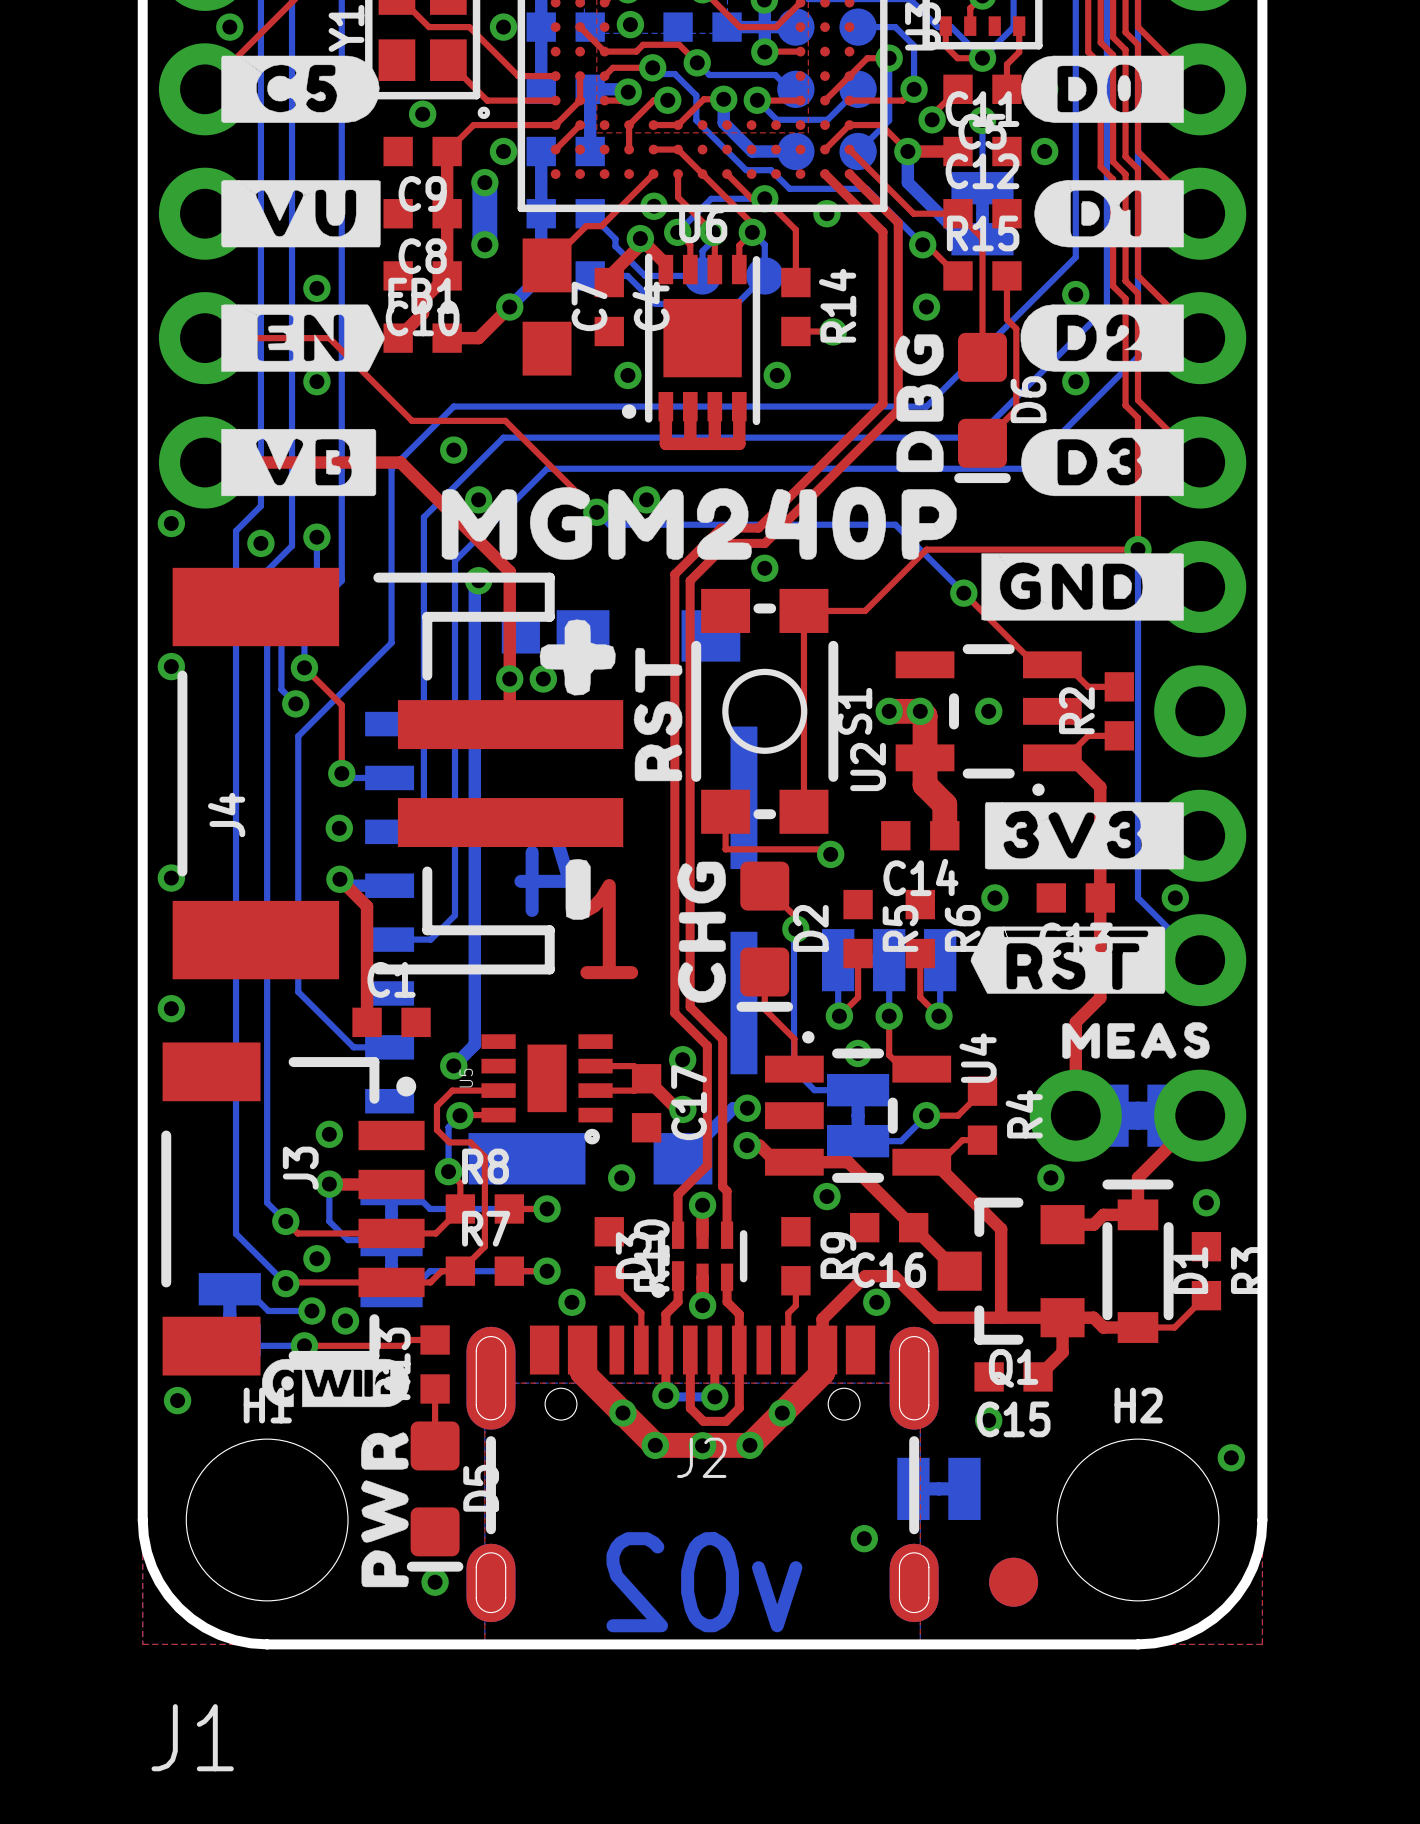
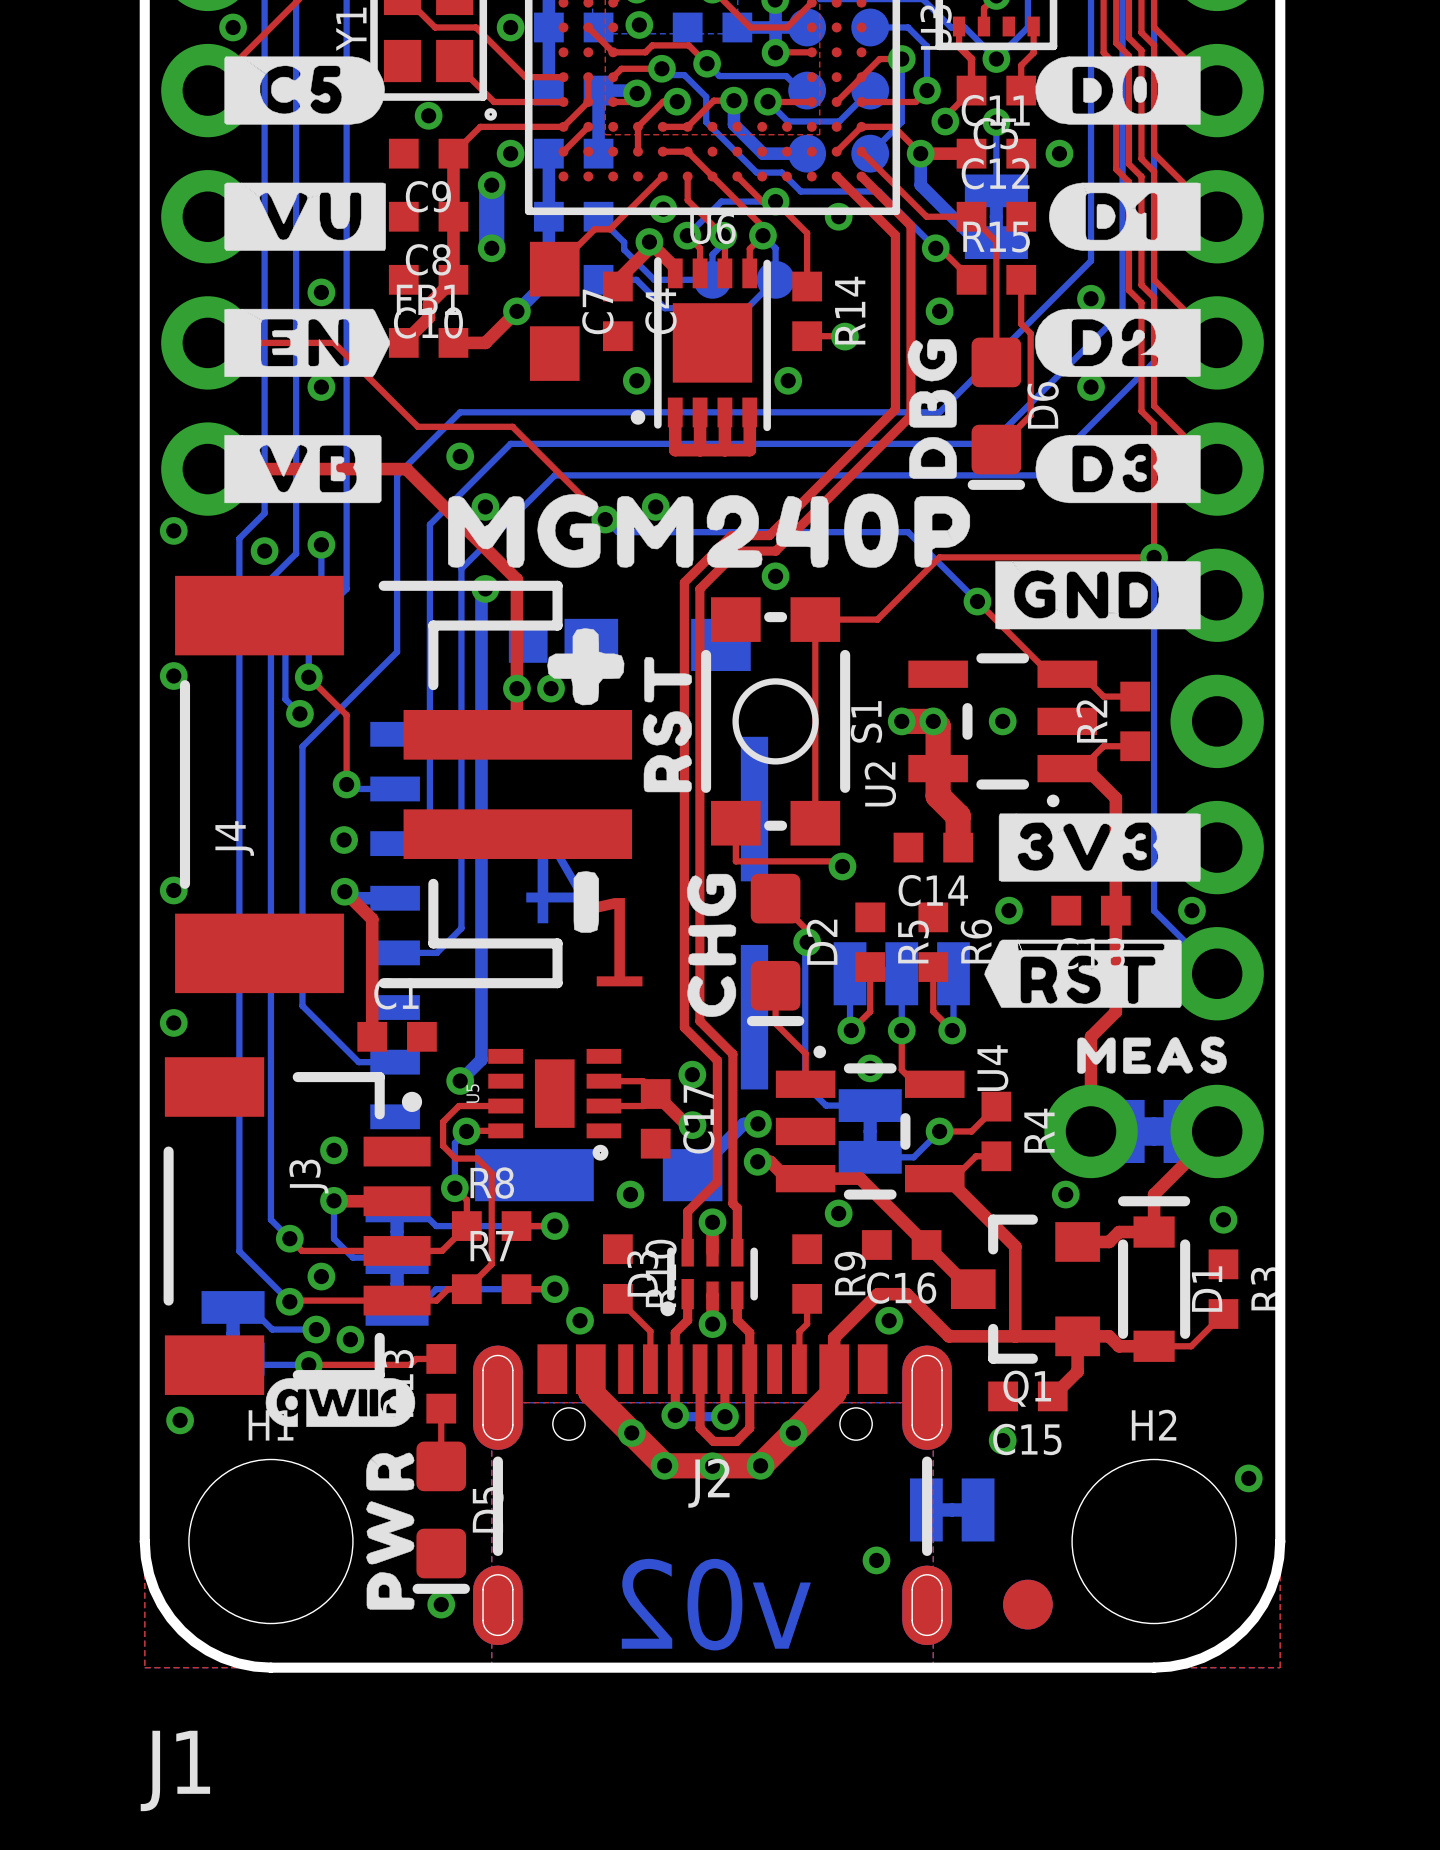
top track: (945, 46) (957, 58) (982, 58) -> (959, 46) (971, 59) (971, 90)

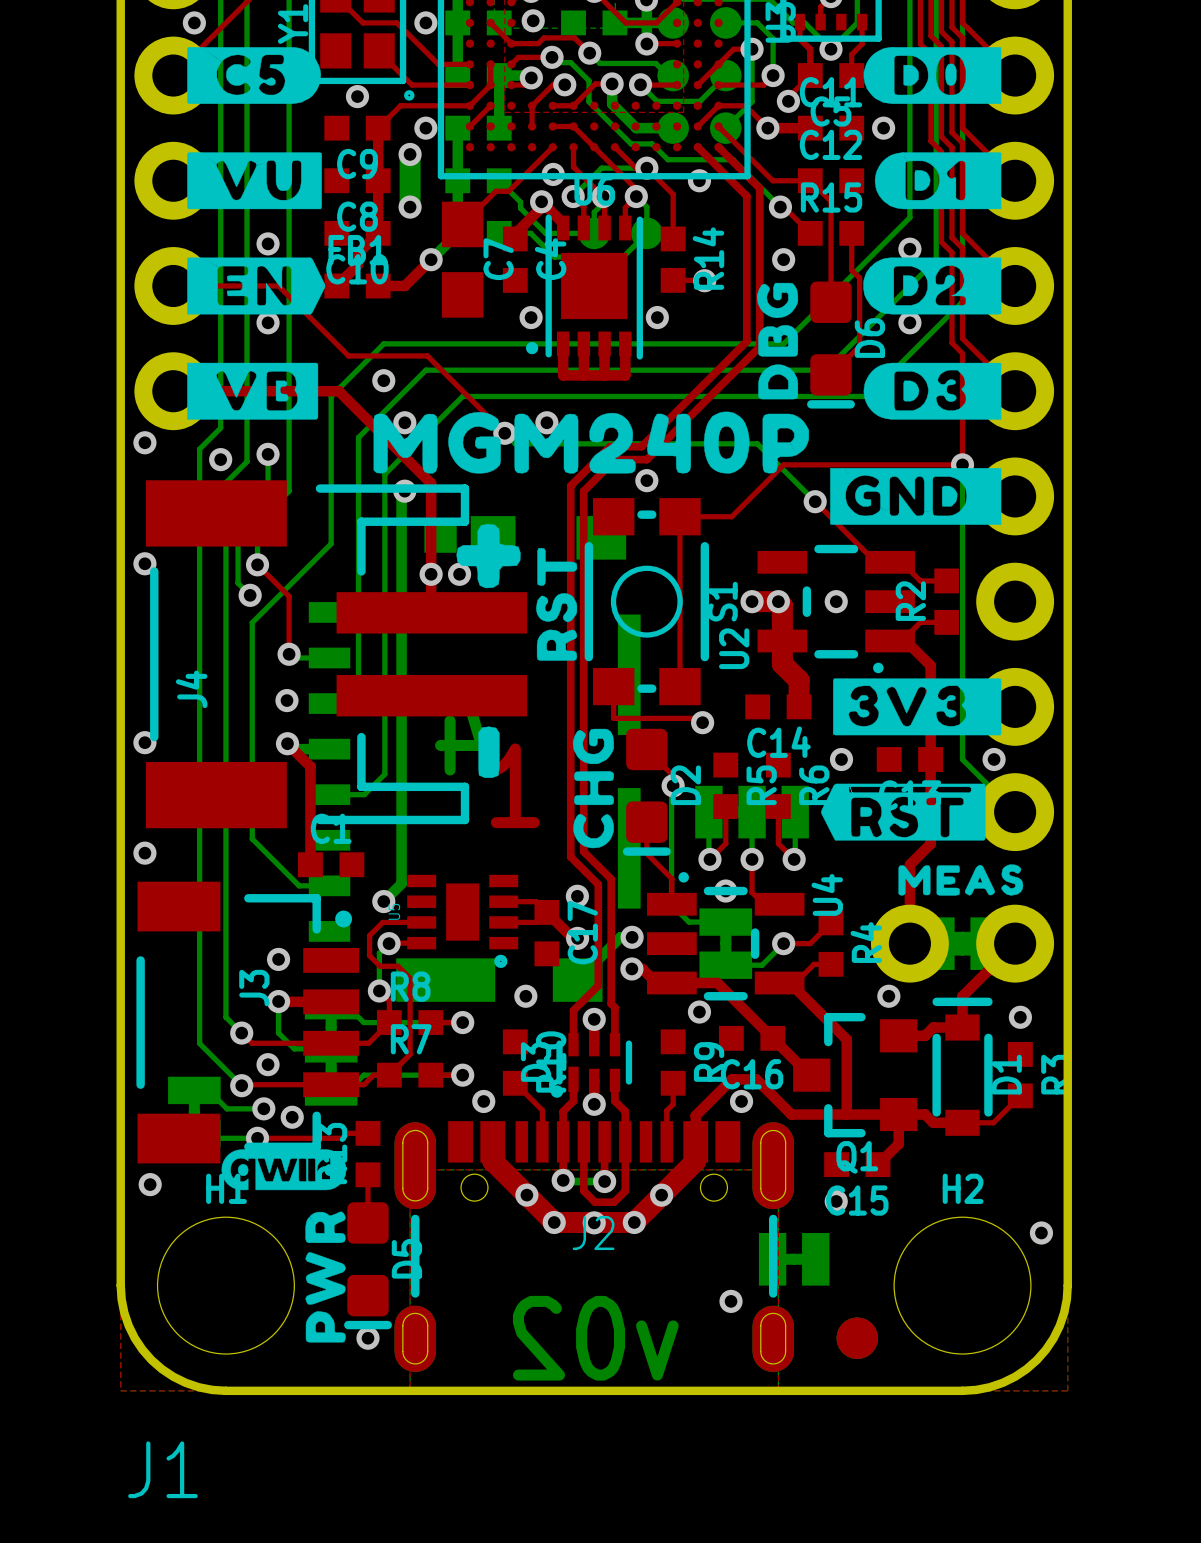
bottom track: (996, 122) (996, 190) -> none
via: (996, 122) -> none
bottom track: (920, 153) (920, 185) (978, 242) (996, 242) -> none
part: (996, 216) -> none

